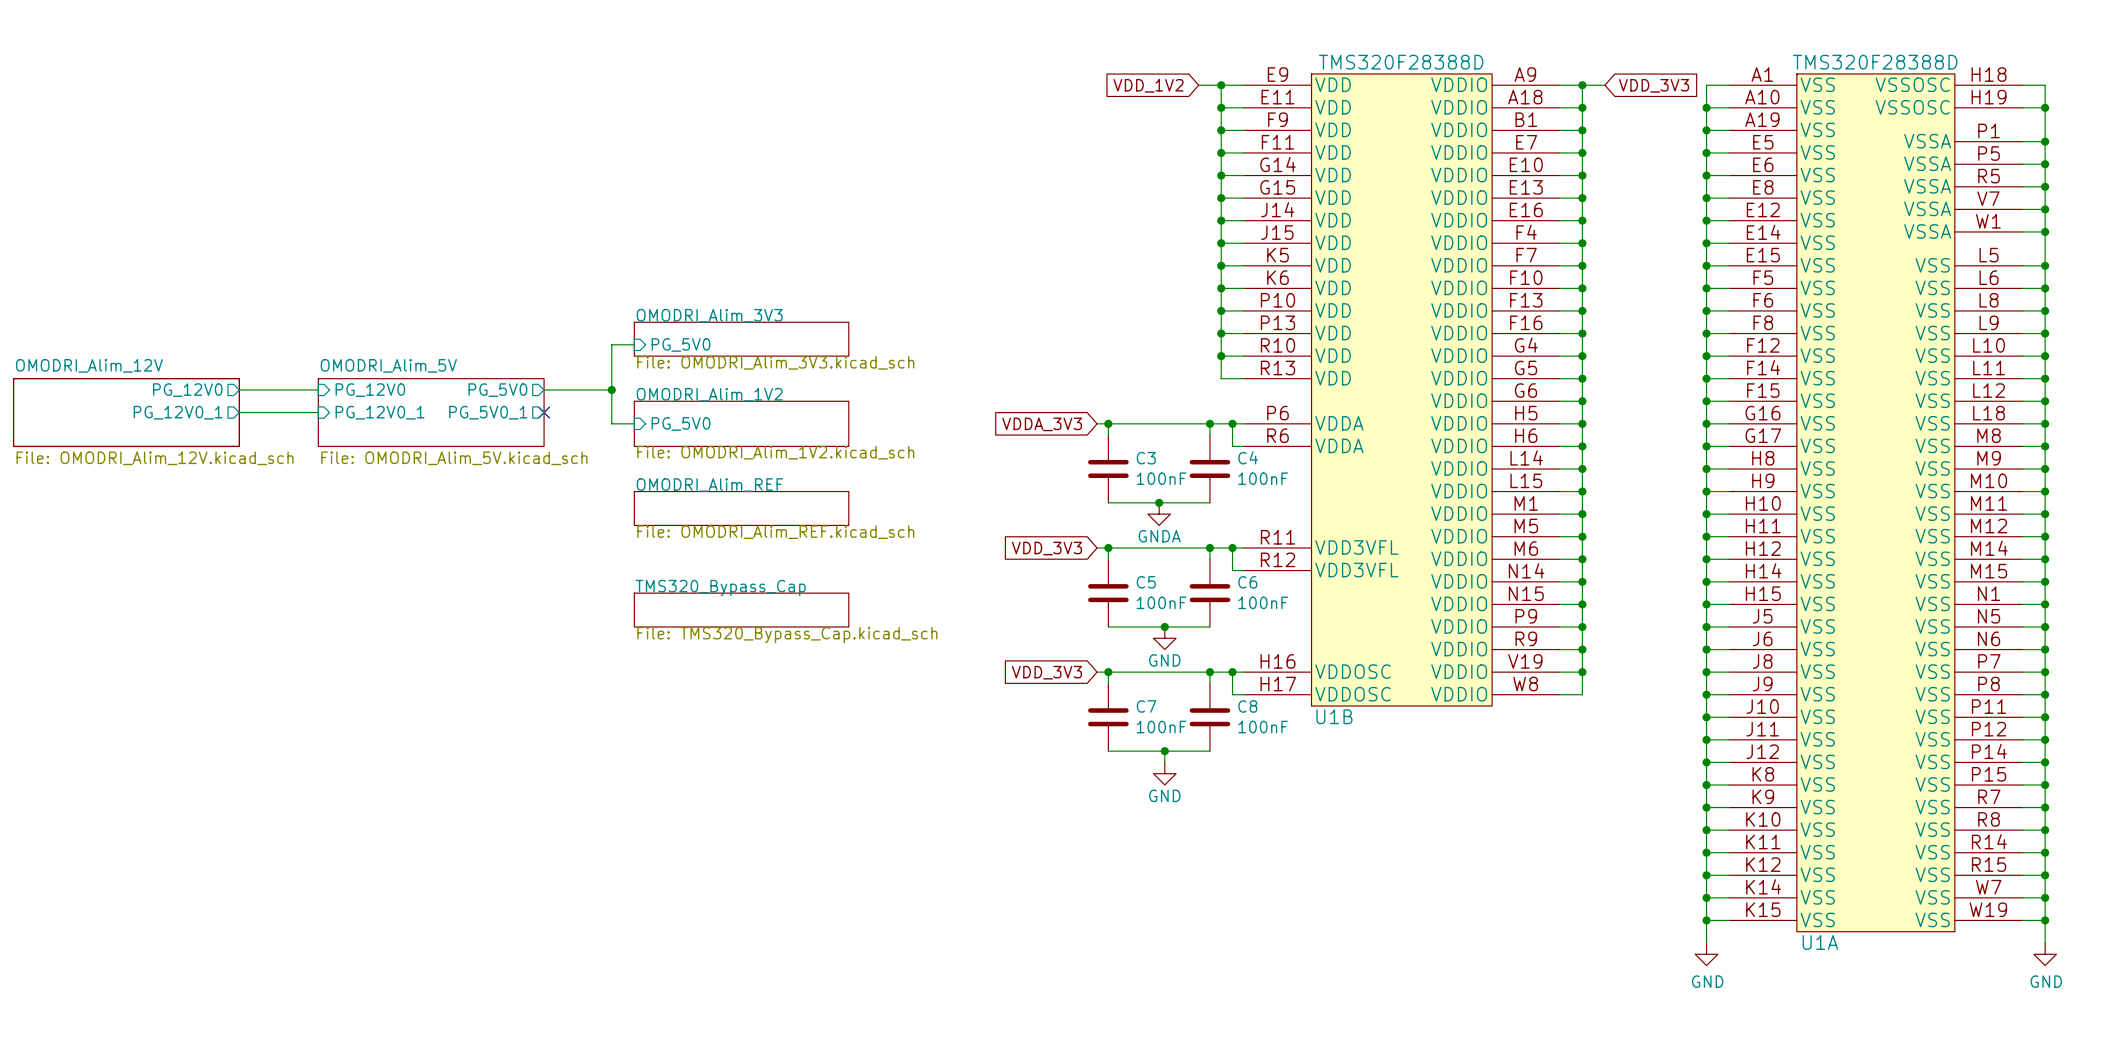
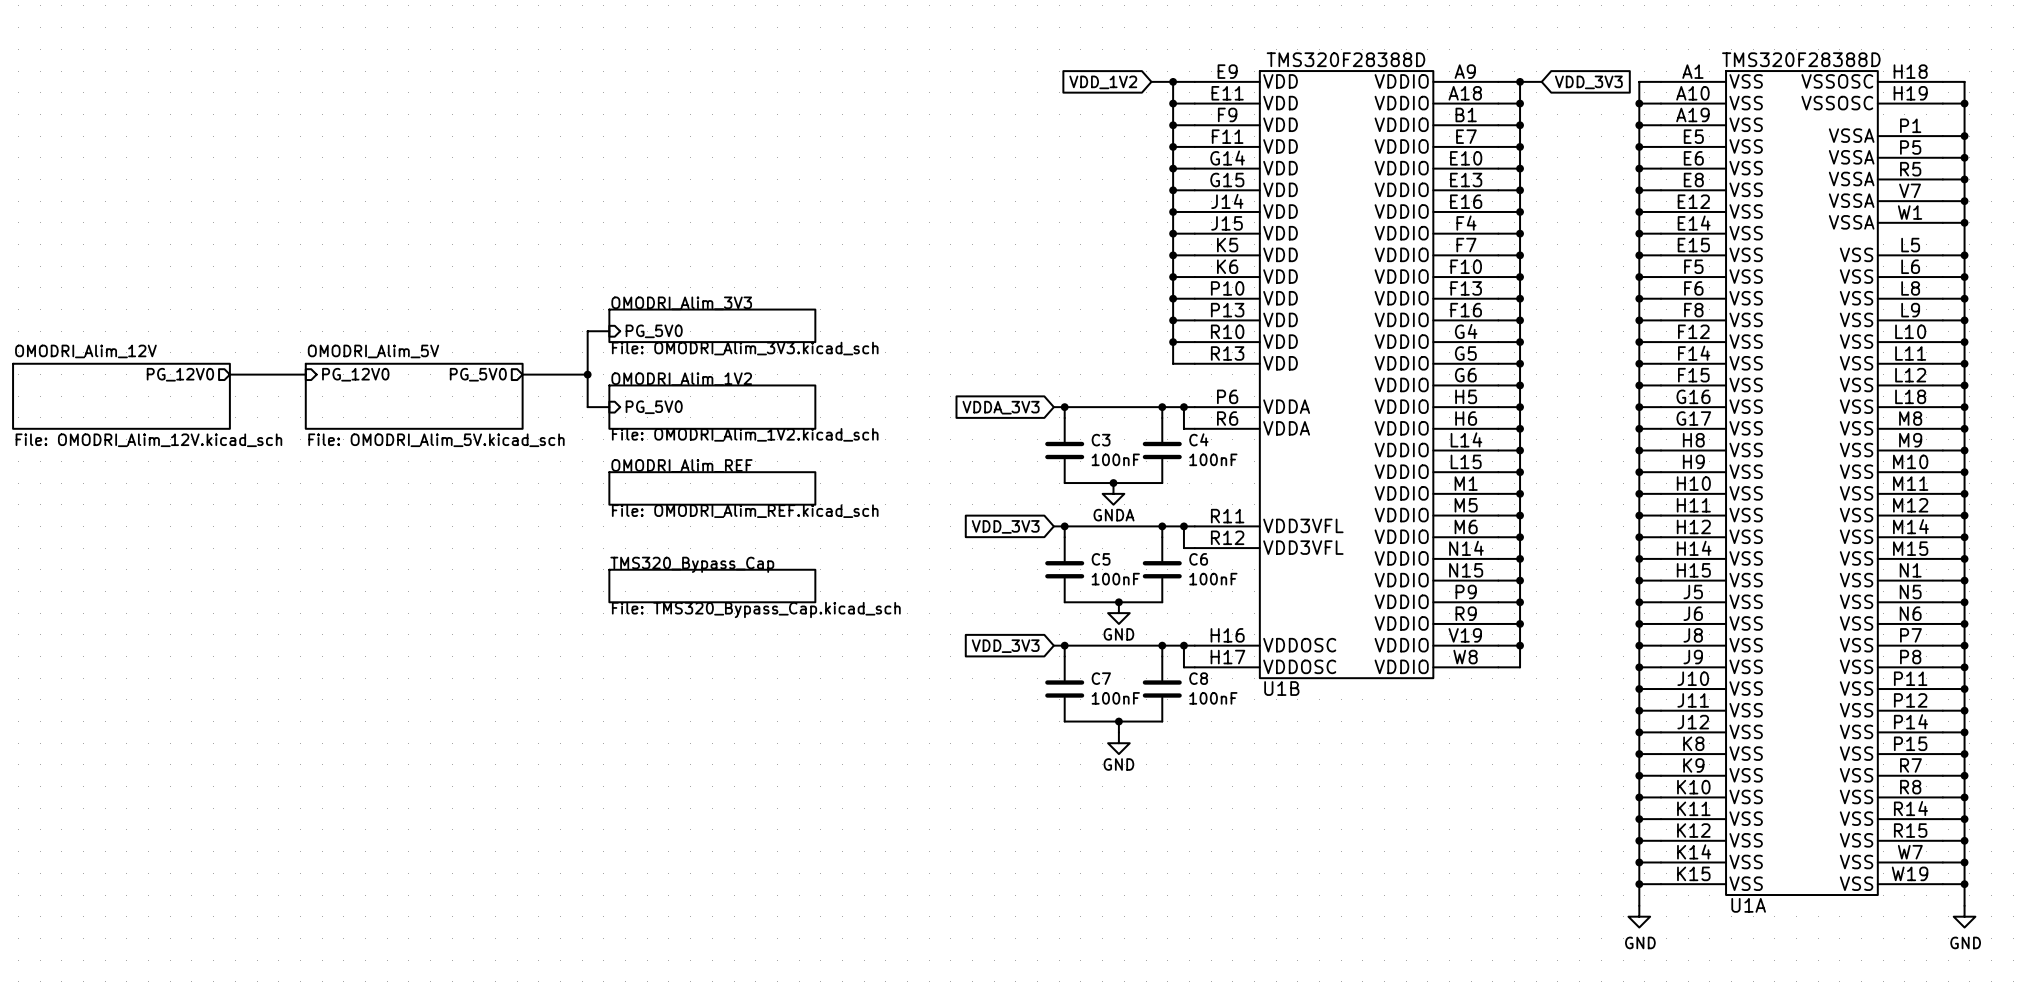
sheet pin: PG_12V0_1 (178, 412) -> none
wire: (239, 412) (318, 412) -> none
sheet pin: PG_12V0_1 (380, 412) -> none
sheet pin: PG_5V0_1 (488, 412) -> none
no-connect mark: (544, 412) -> none

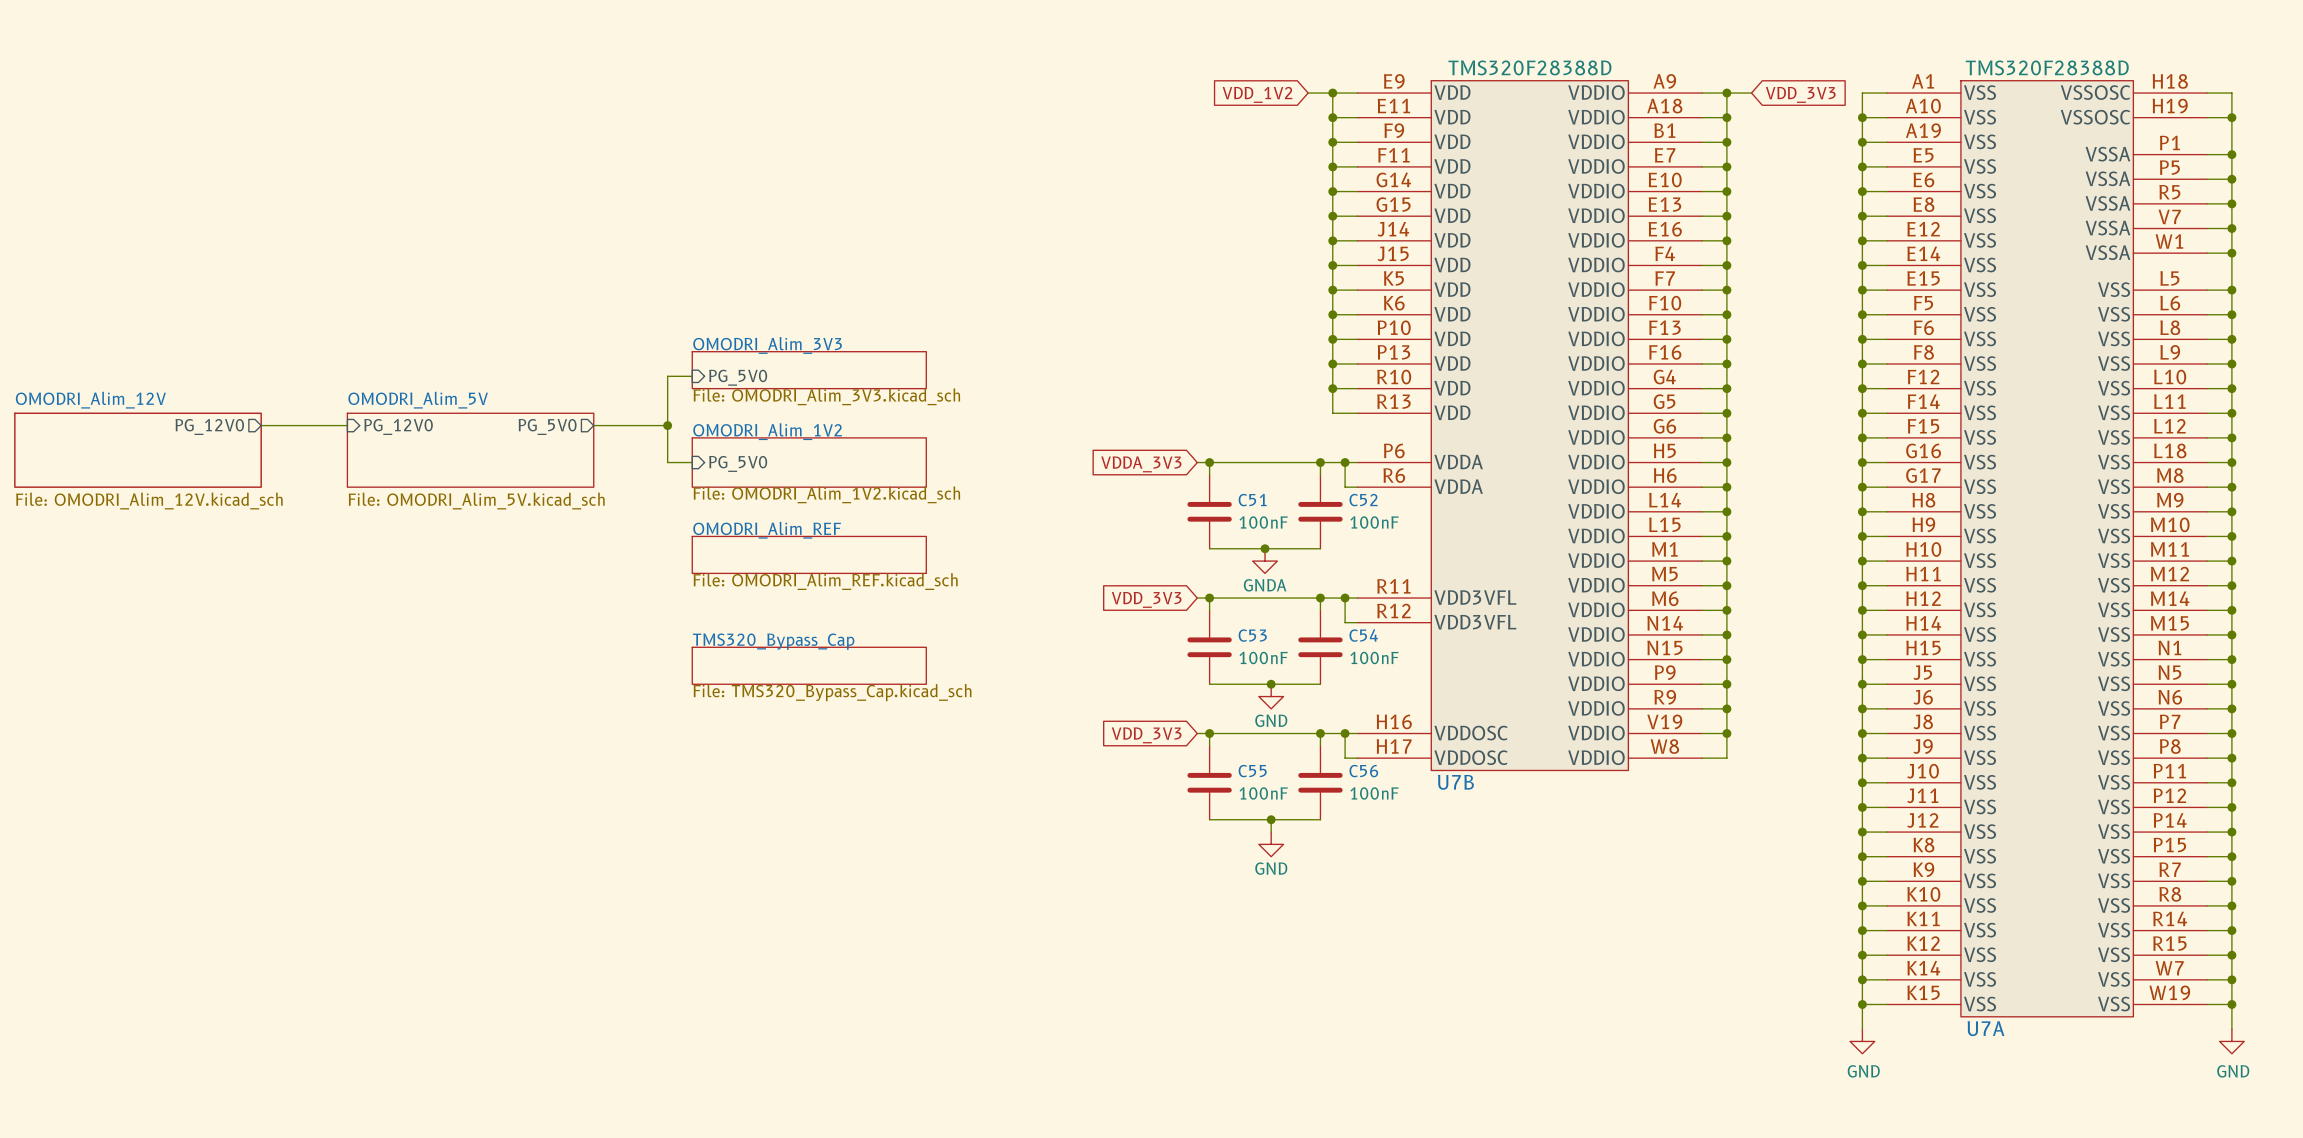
C4 name: C4 (1198, 439) -> C52 (1363, 500)
C3 name: C3 (1101, 440) -> C51 (1252, 500)
C5 name: C5 (1101, 559) -> C53 (1252, 635)
C6 name: C6 (1198, 559) -> C54 (1363, 635)
C7 name: C7 (1101, 678) -> C55 (1252, 771)
C8 name: C8 (1198, 678) -> C56 (1363, 771)
U1B name: U1B (1281, 688) -> U7B (1455, 782)
U1A name: U1A (1748, 905) -> U7A (1985, 1028)

